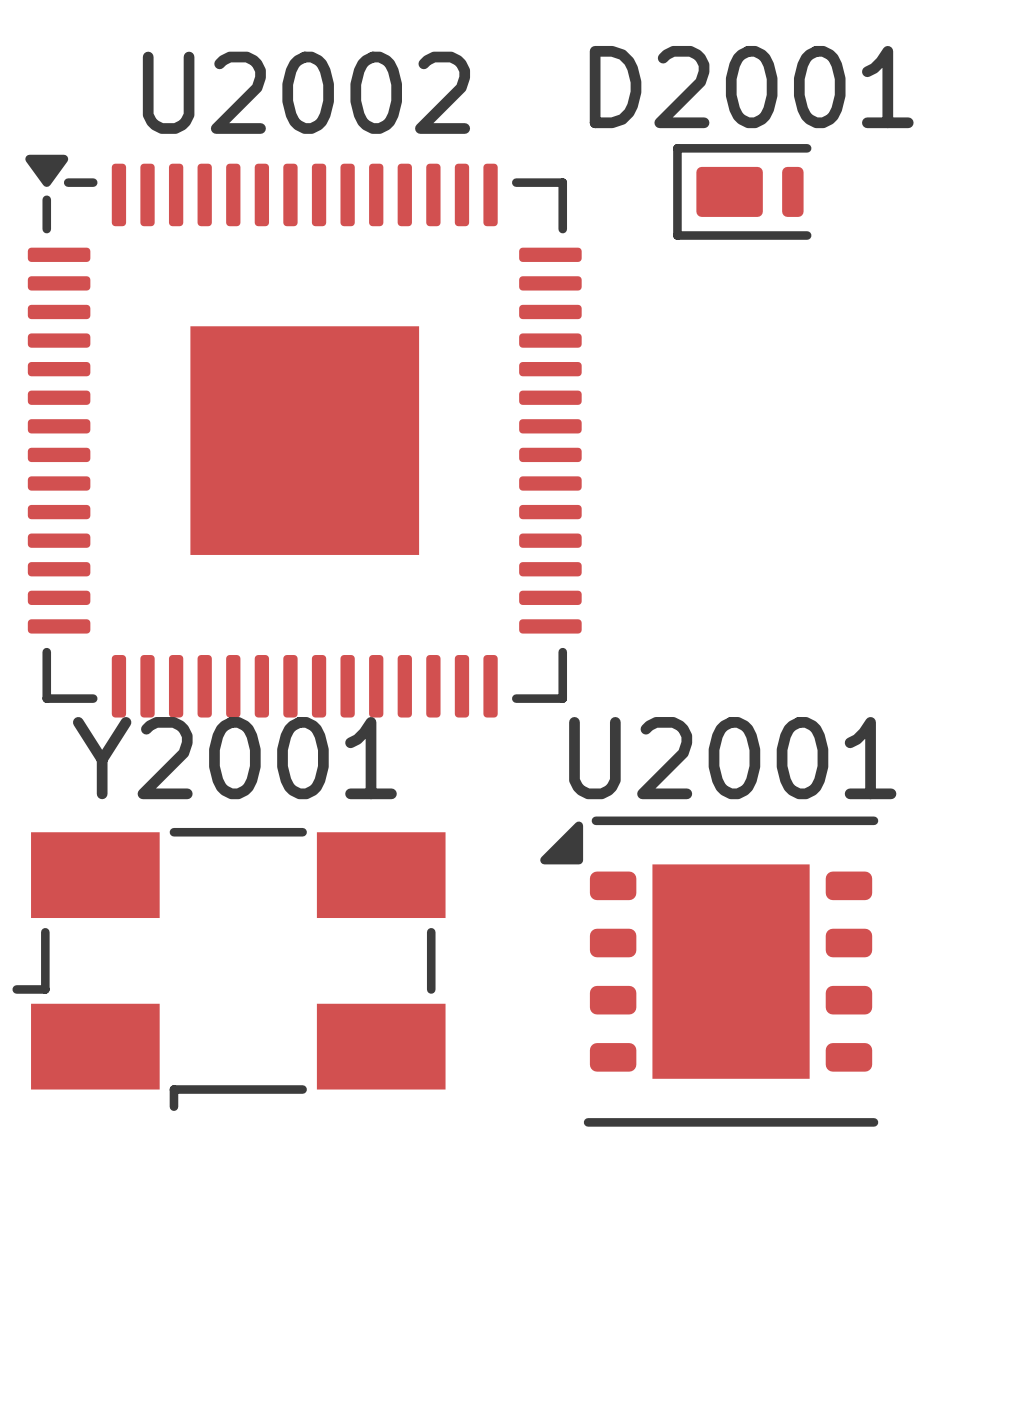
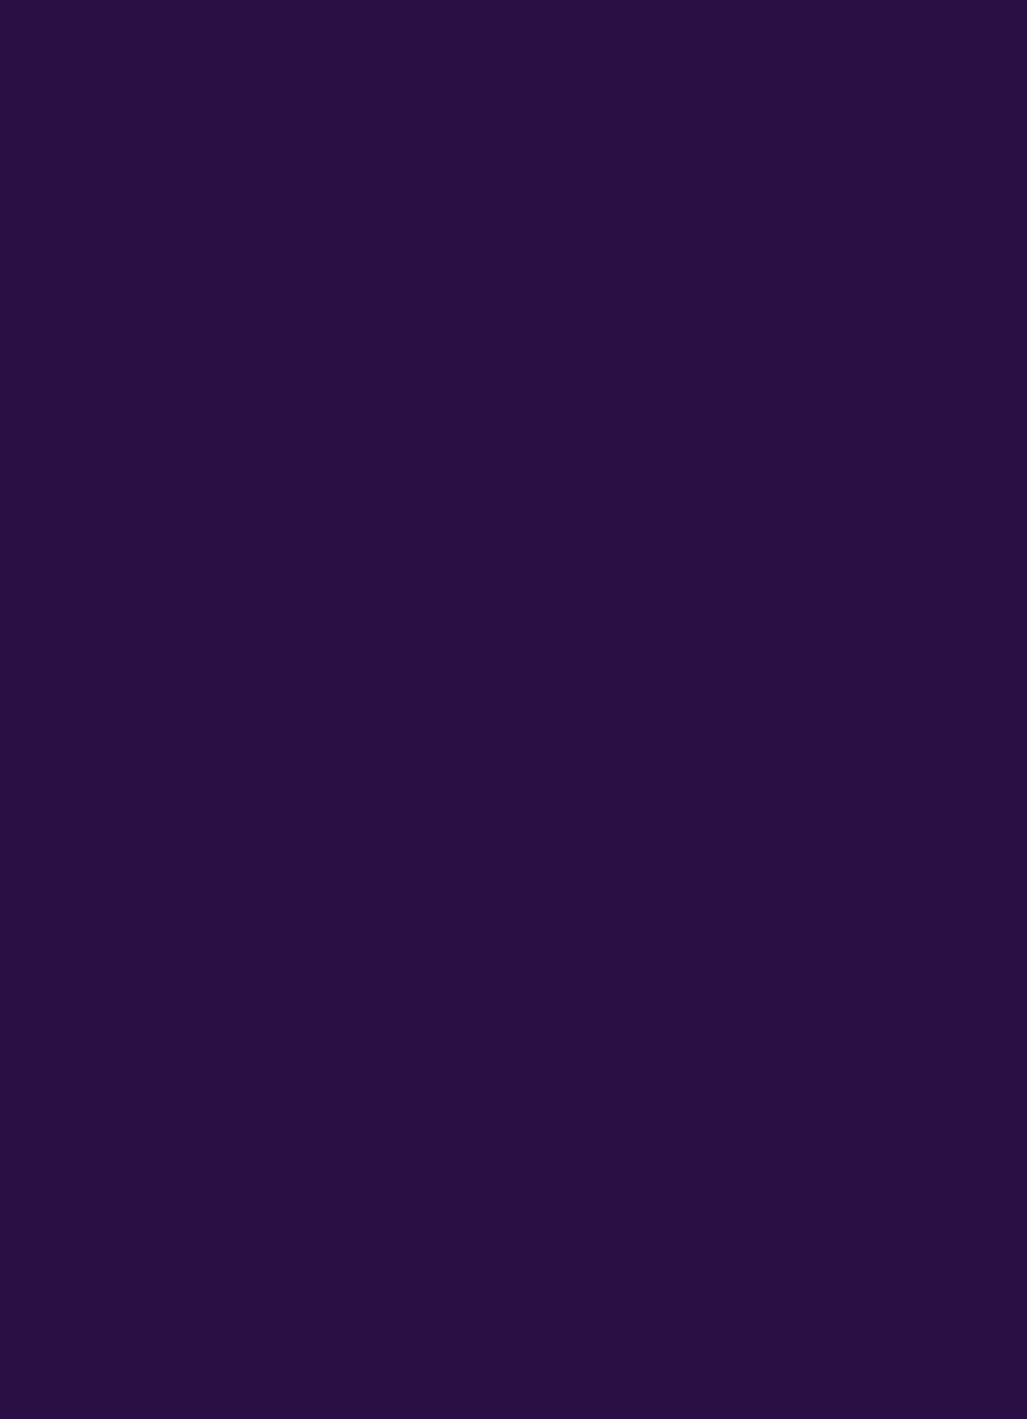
D2001: (742, 191) -> none
U2002: (303, 436) -> none
Y2001: (228, 969) -> none
U2001: (709, 971) -> none

